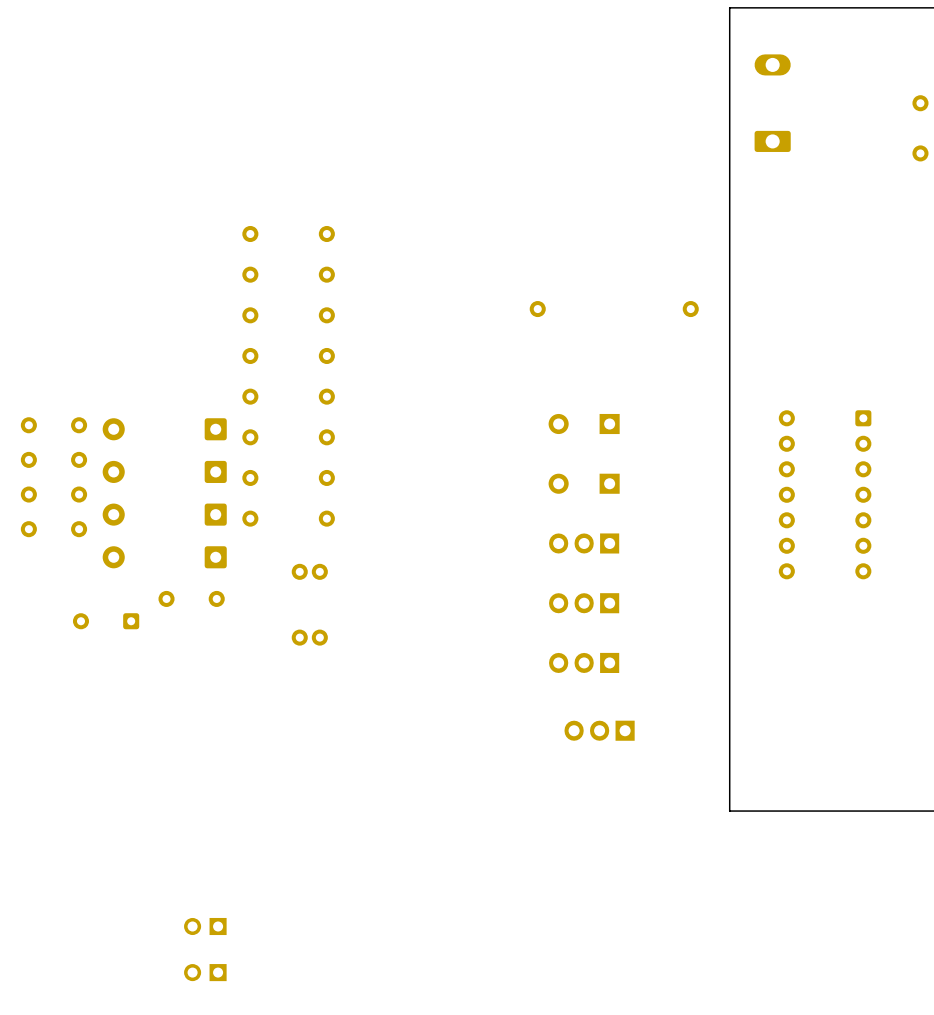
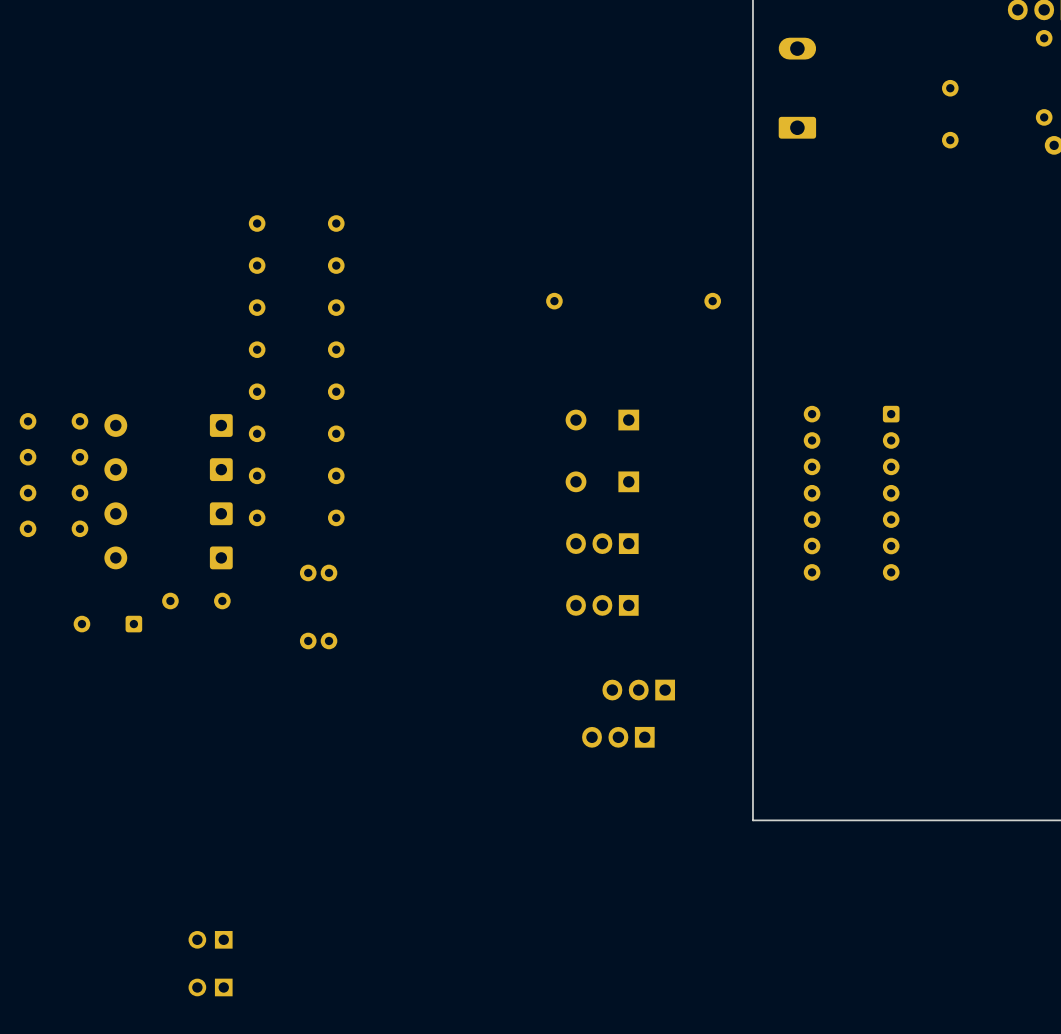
part position: (584, 662) -> (638, 690)

